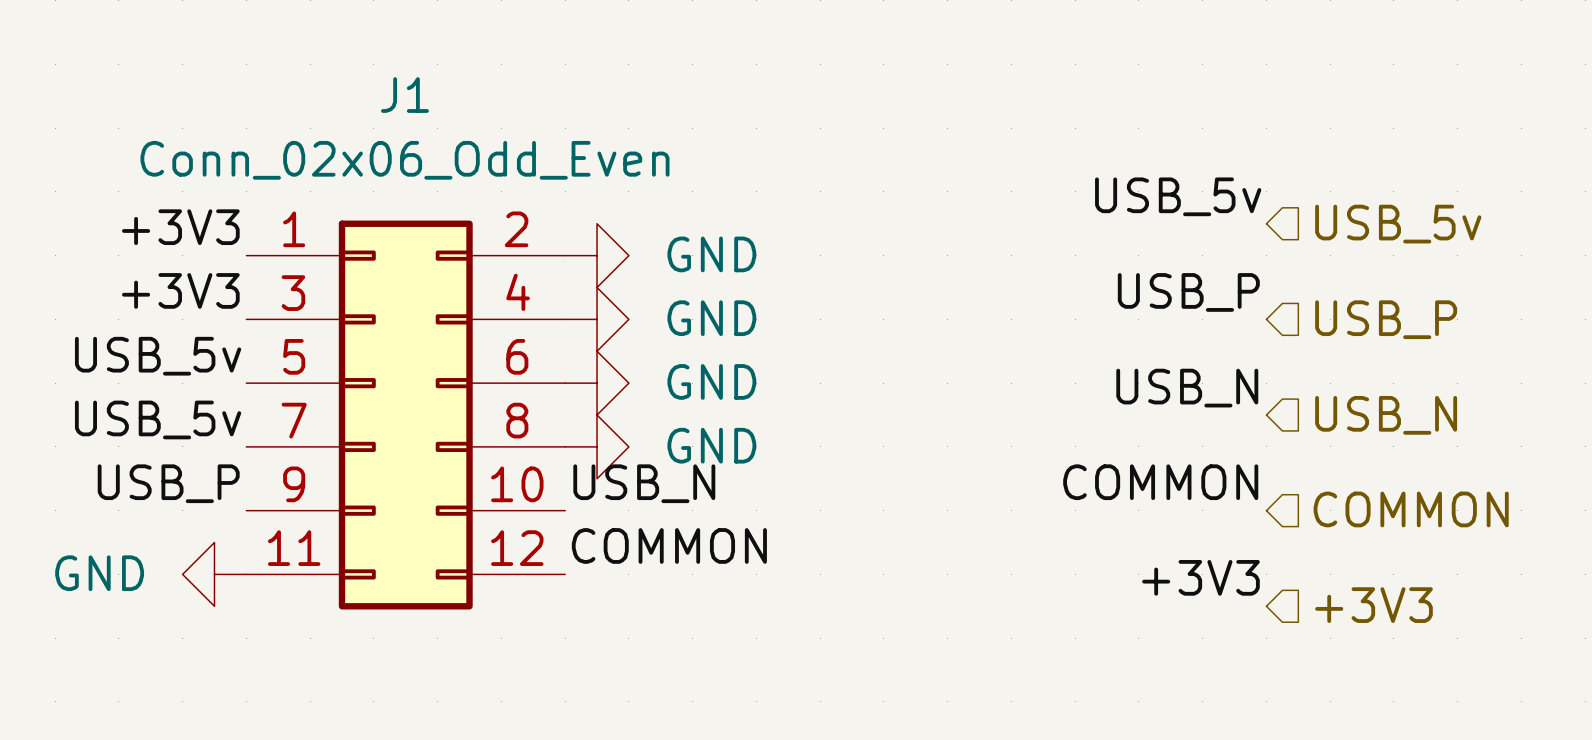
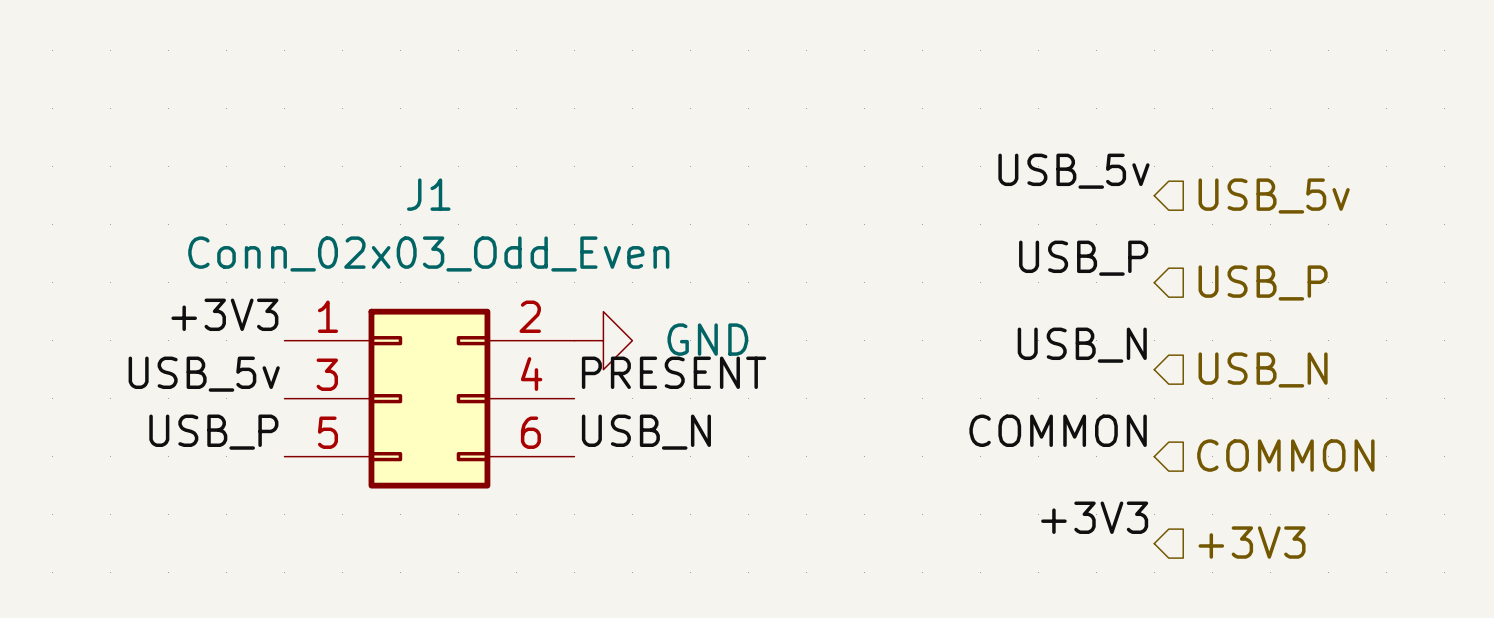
J1 name position: J1 (404, 95) -> J1 (428, 194)
J1 value: Conn_02x06_Odd_Even (404, 160) -> Conn_02x03_Odd_Even (428, 253)
J1 symbol: [246, 220, 566, 610] -> [284, 308, 575, 489]
label: +3V3 (180, 227) -> none
power symbol: GND (597, 255) -> none
label position: +3V3 (180, 290) -> +3V3 (224, 314)
power symbol: GND (597, 319) -> none
label: USB_5v (158, 356) -> none
power symbol: GND (597, 383) -> none
power symbol: none -> GND (603, 340)
label: none -> PRESENT (674, 372)
label: USB_5v (158, 419) -> none
label: none -> USB_5v (204, 374)
power symbol: GND (597, 446) -> none
label position: USB_P (168, 483) -> USB_P (213, 432)
label position: USB_N (644, 483) -> USB_N (646, 432)
label: COMMON (669, 545) -> none
power symbol: GND (214, 574) -> none

